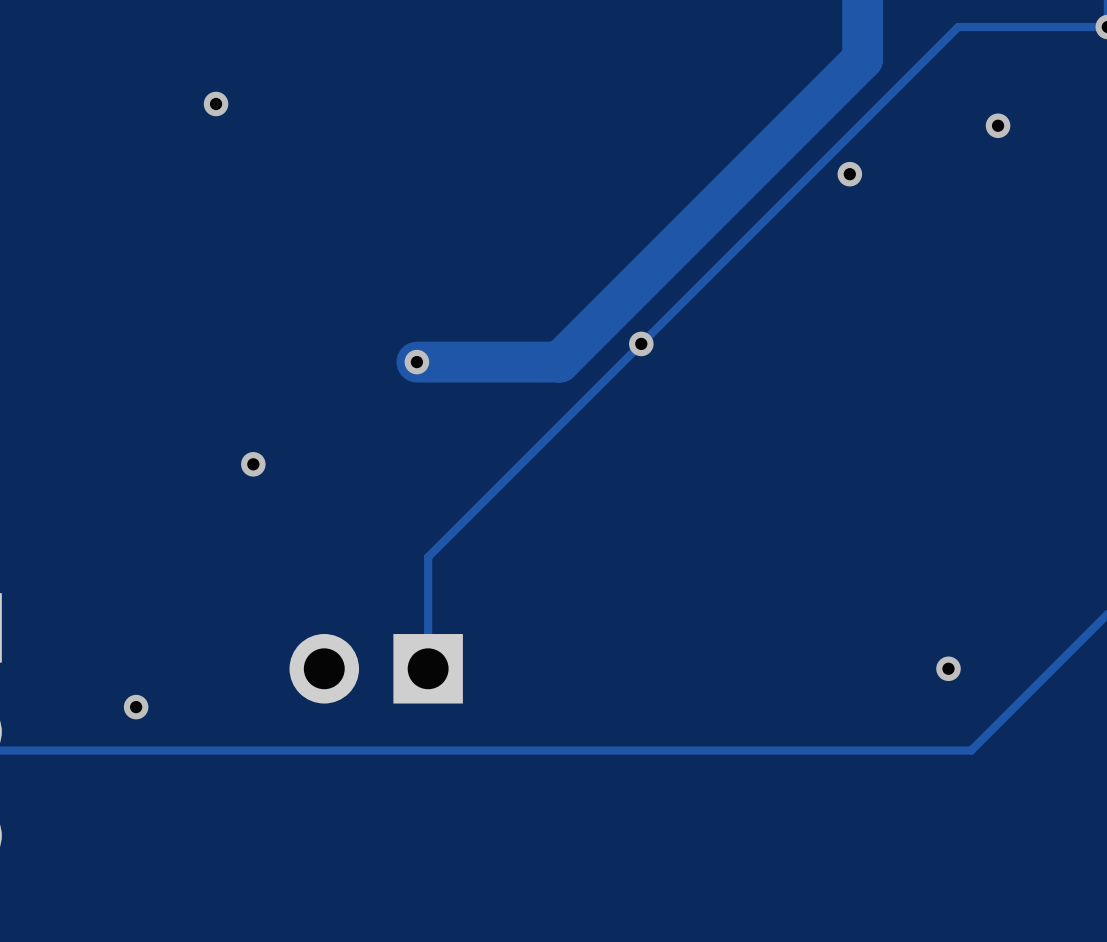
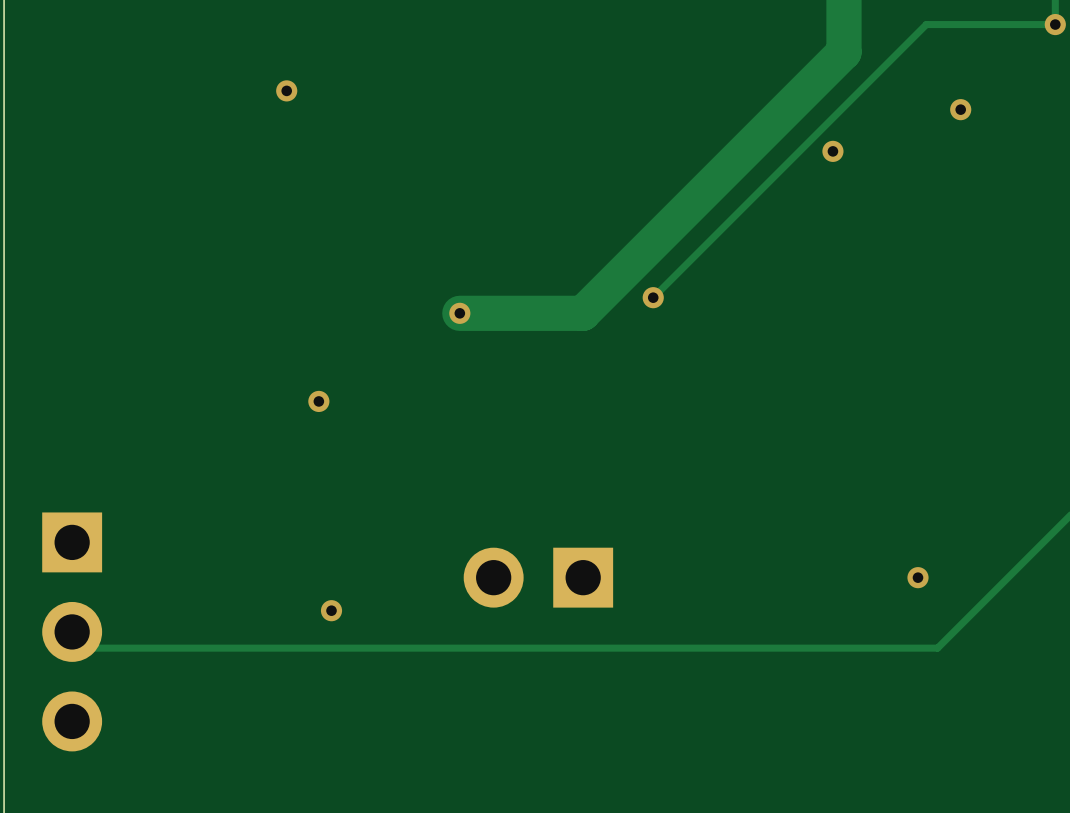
track: (641, 343) (428, 557) (428, 668) -> none
part position: (376, 668) -> (538, 577)
via position: (136, 707) -> (331, 610)

